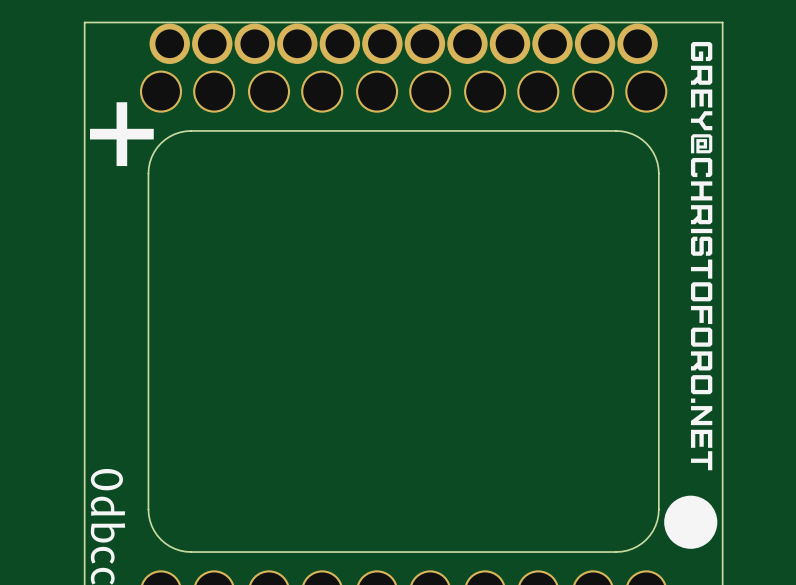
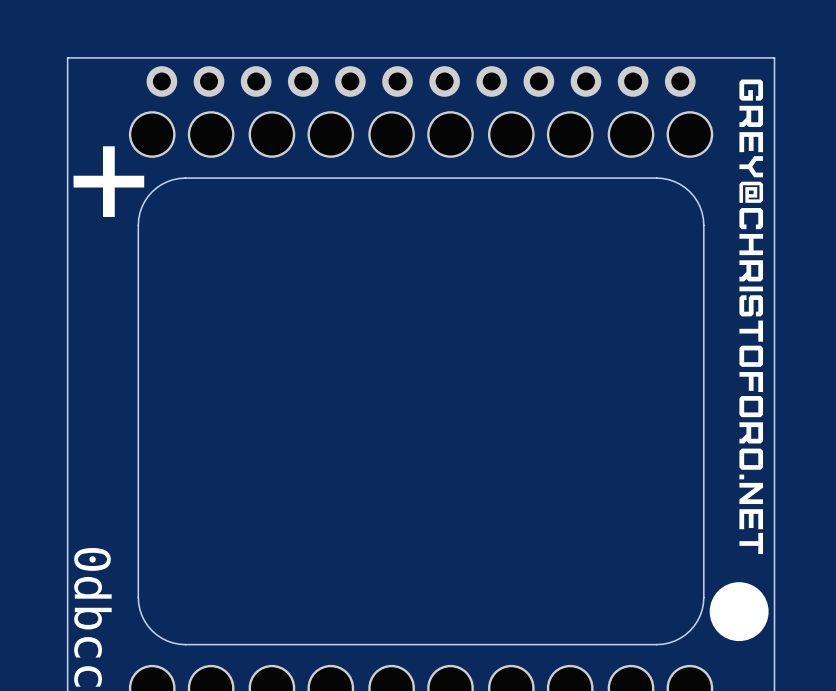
part footprint: [149, 23, 190, 64] -> [146, 66, 178, 97]
part footprint: [192, 23, 233, 64] -> [193, 66, 225, 97]
part footprint: [234, 23, 275, 64] -> [240, 66, 272, 97]
part footprint: [277, 23, 318, 64] -> [287, 66, 319, 97]
part footprint: [319, 23, 361, 64] -> [335, 66, 366, 97]
part footprint: [362, 23, 403, 64] -> [382, 66, 413, 97]
part footprint: [404, 23, 446, 64] -> [429, 66, 460, 97]
part footprint: [447, 23, 488, 64] -> [476, 66, 508, 97]
part footprint: [489, 23, 531, 64] -> [523, 66, 555, 97]
part footprint: [532, 23, 573, 64] -> [570, 66, 602, 97]
part footprint: [574, 23, 616, 64] -> [617, 66, 649, 97]
part footprint: [617, 23, 658, 64] -> [664, 66, 696, 97]

